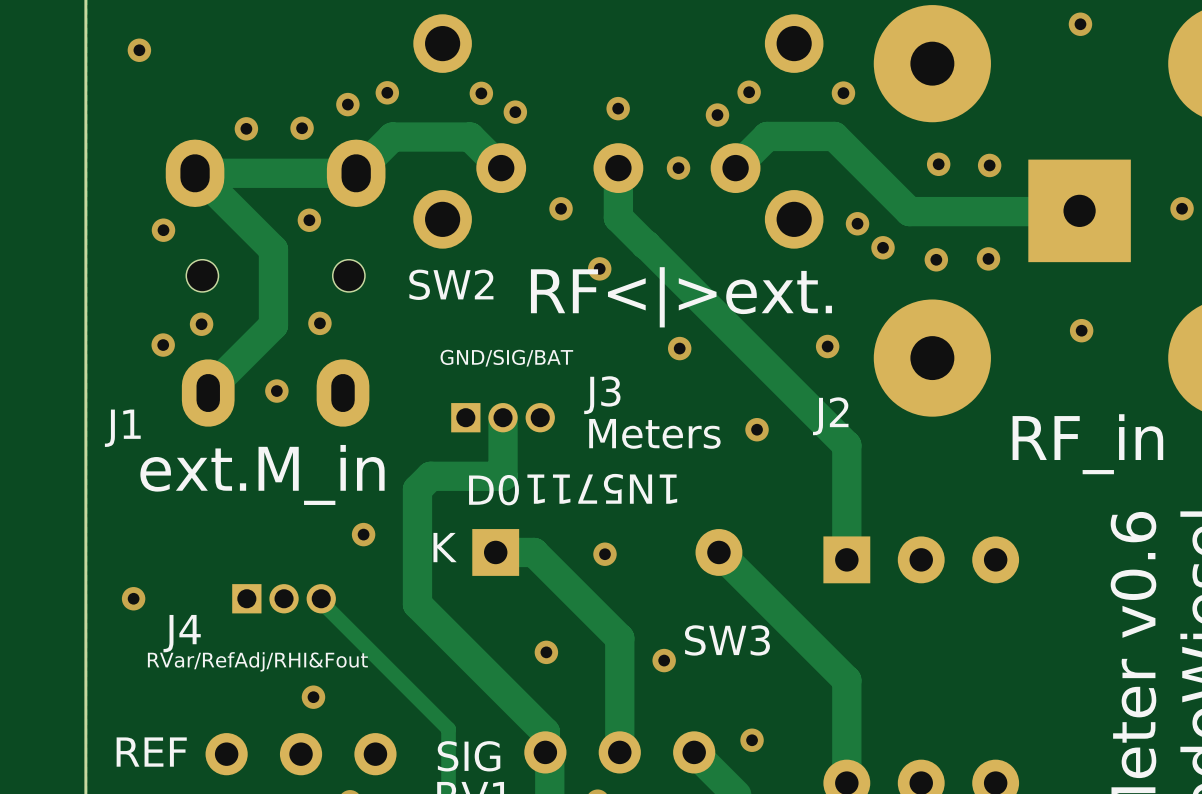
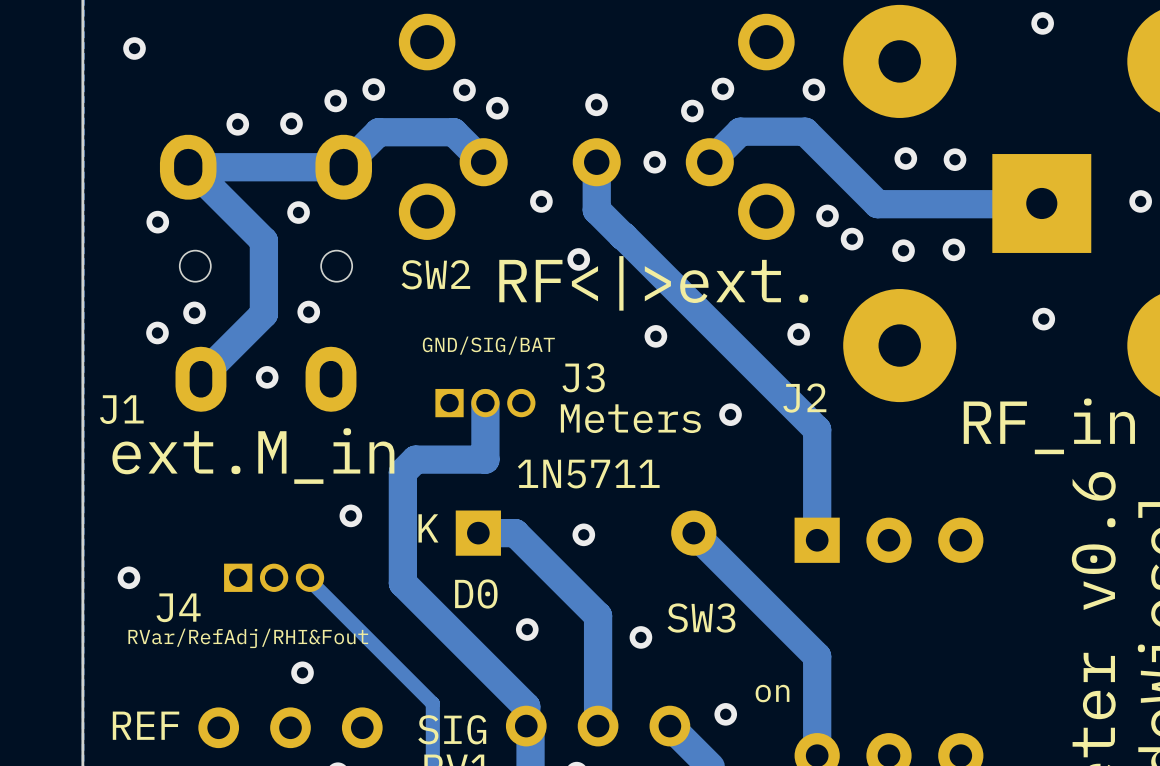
text rotation: 0° (602, 488) -> 180° (588, 474)
text position: D0 (494, 490) -> D0 (476, 593)
text: none -> on (772, 693)

